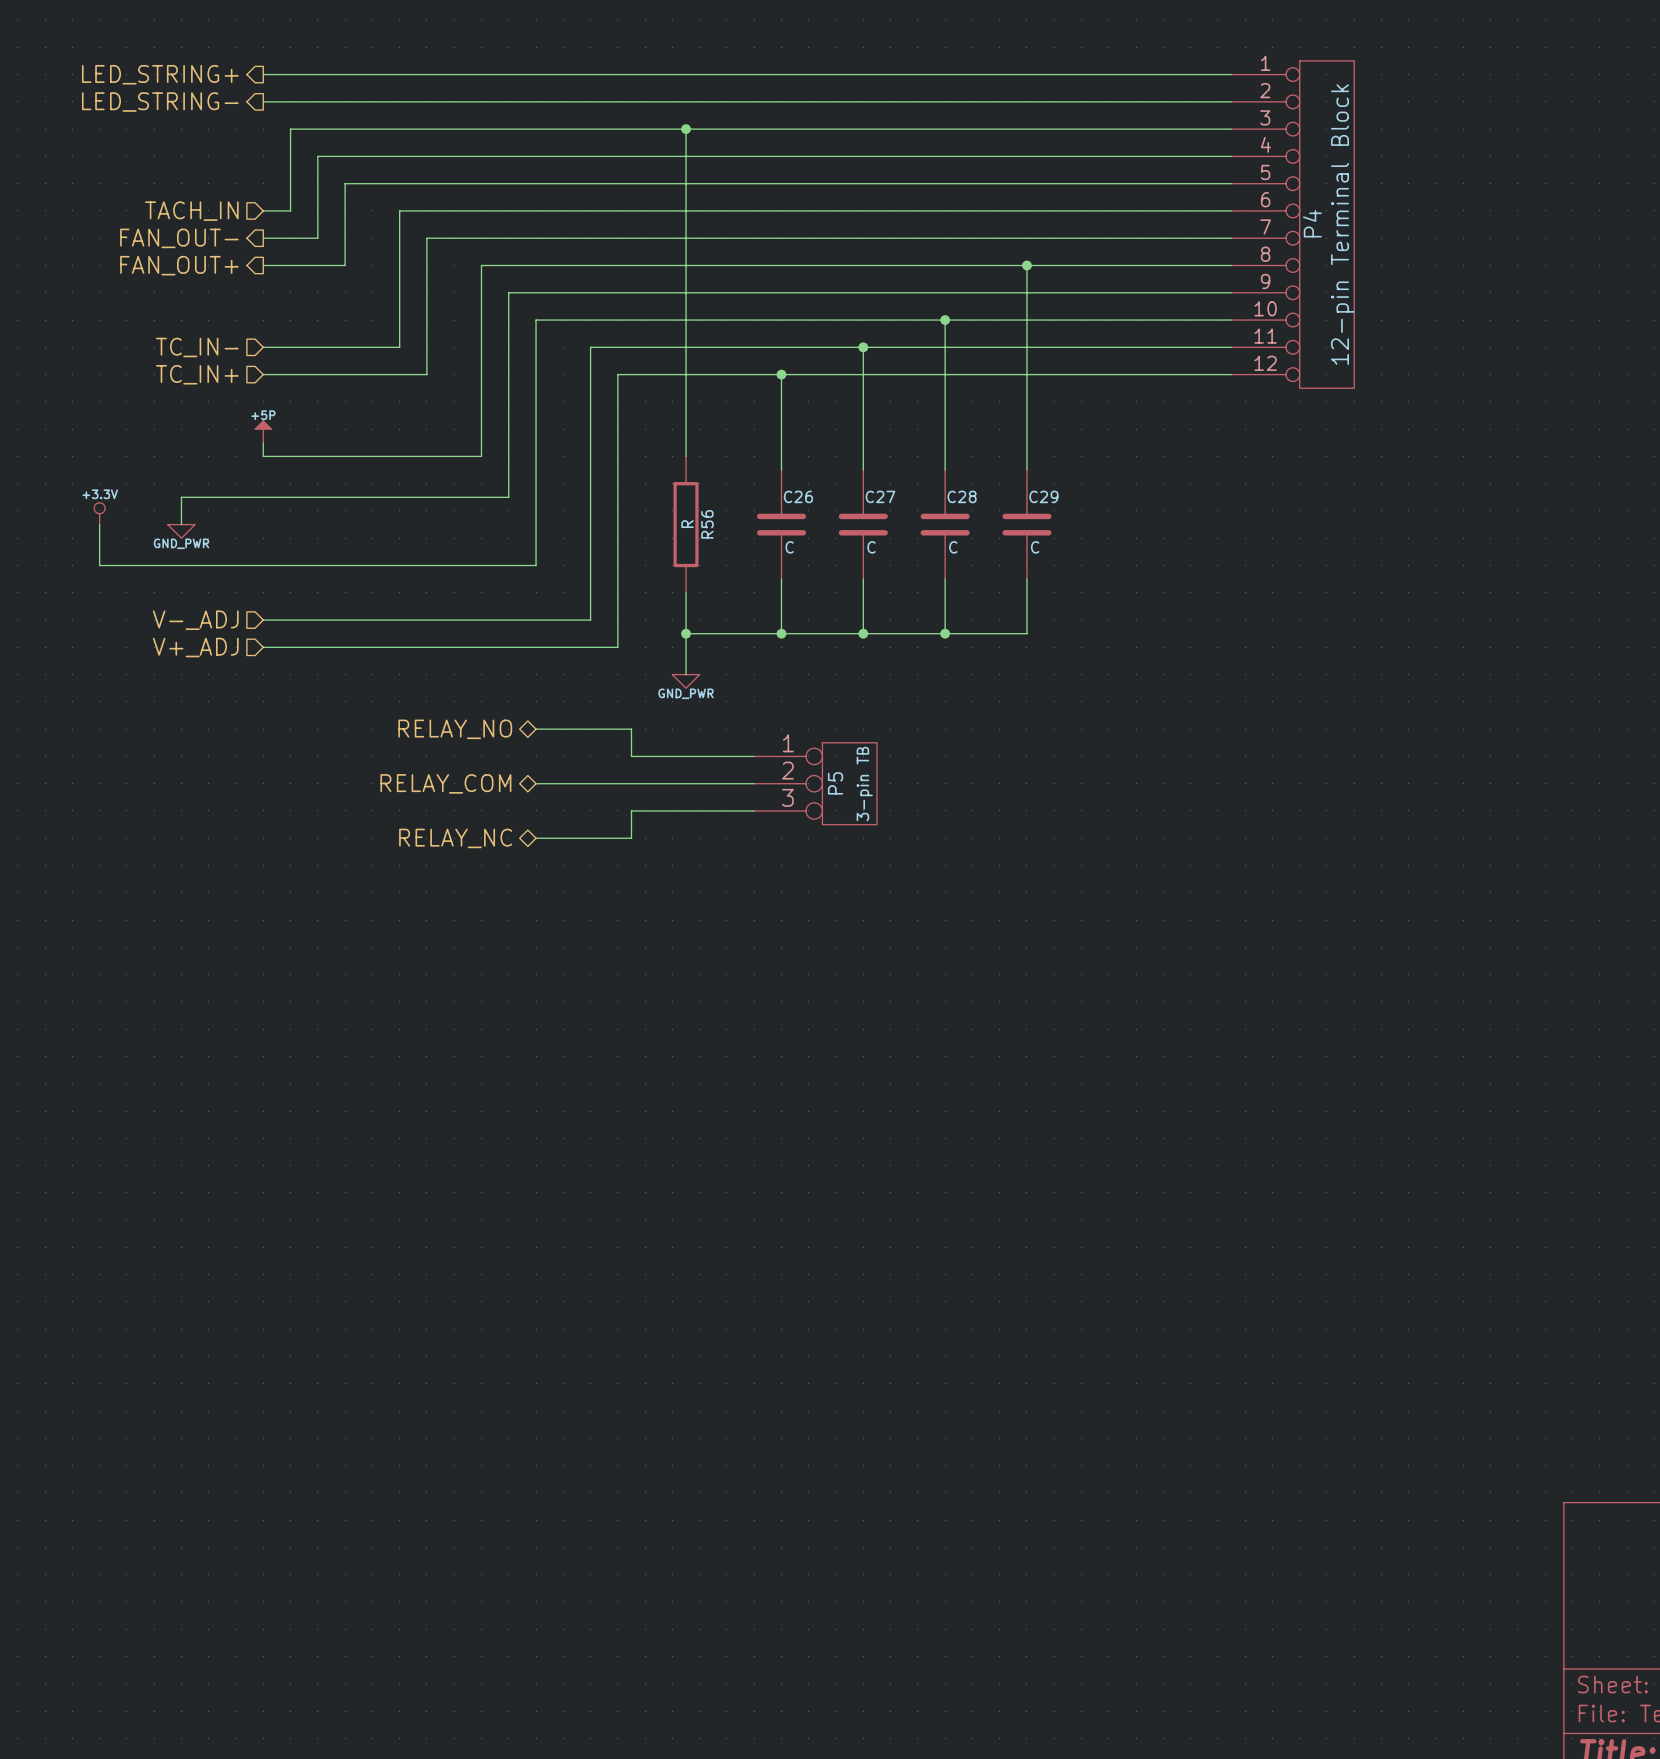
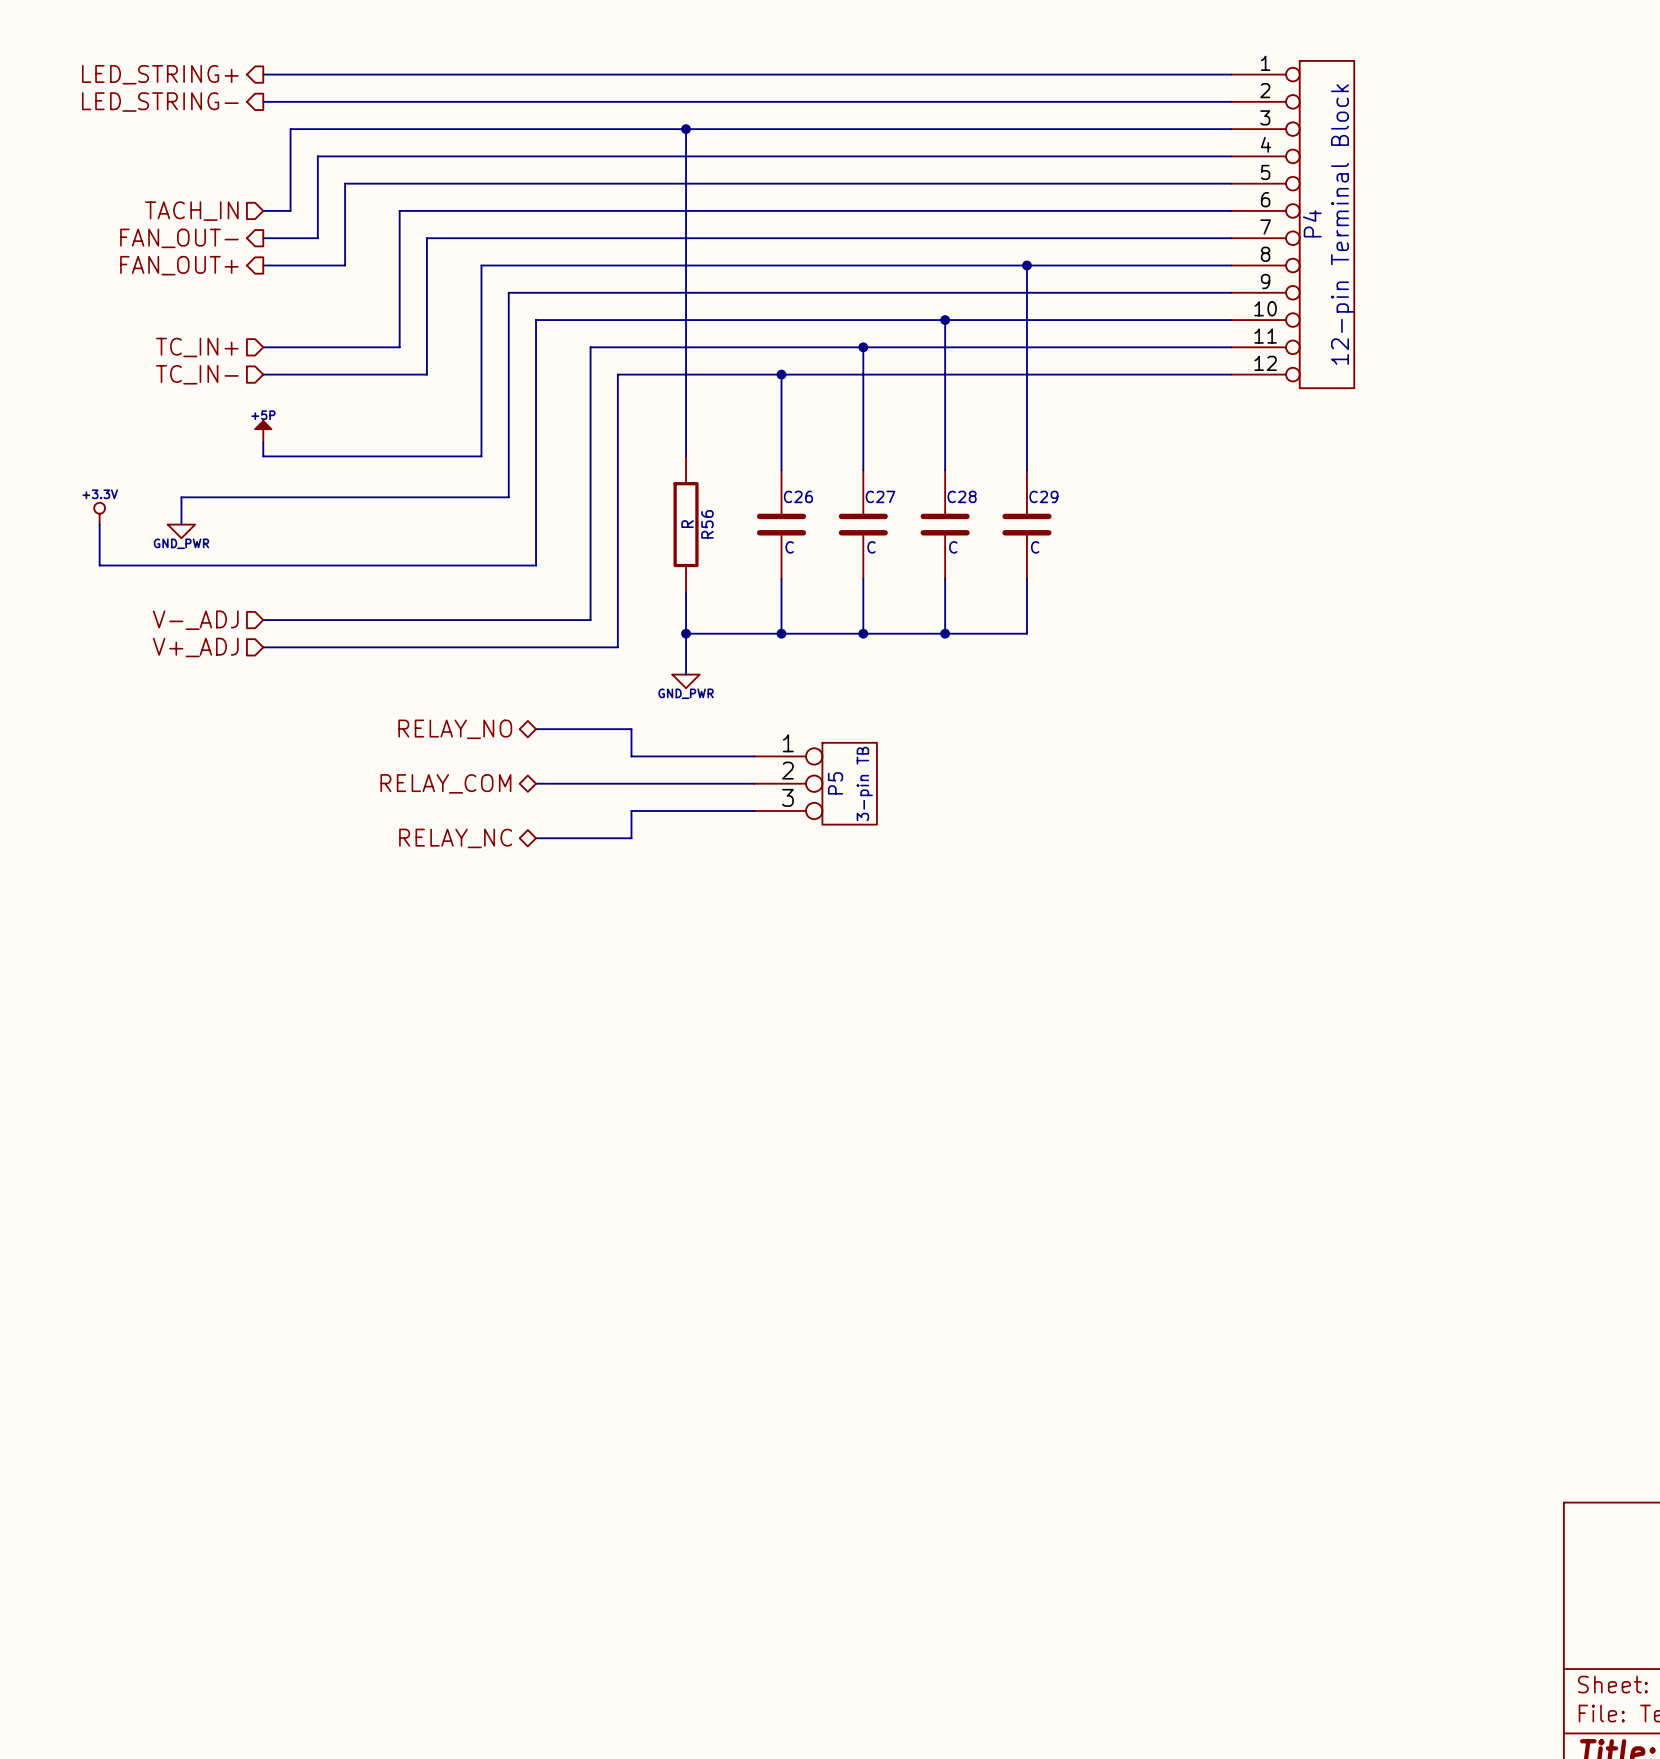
hierarchical label: TC_IN- (197, 347) -> TC_IN+ (197, 347)
hierarchical label: TC_IN+ (197, 374) -> TC_IN- (197, 374)

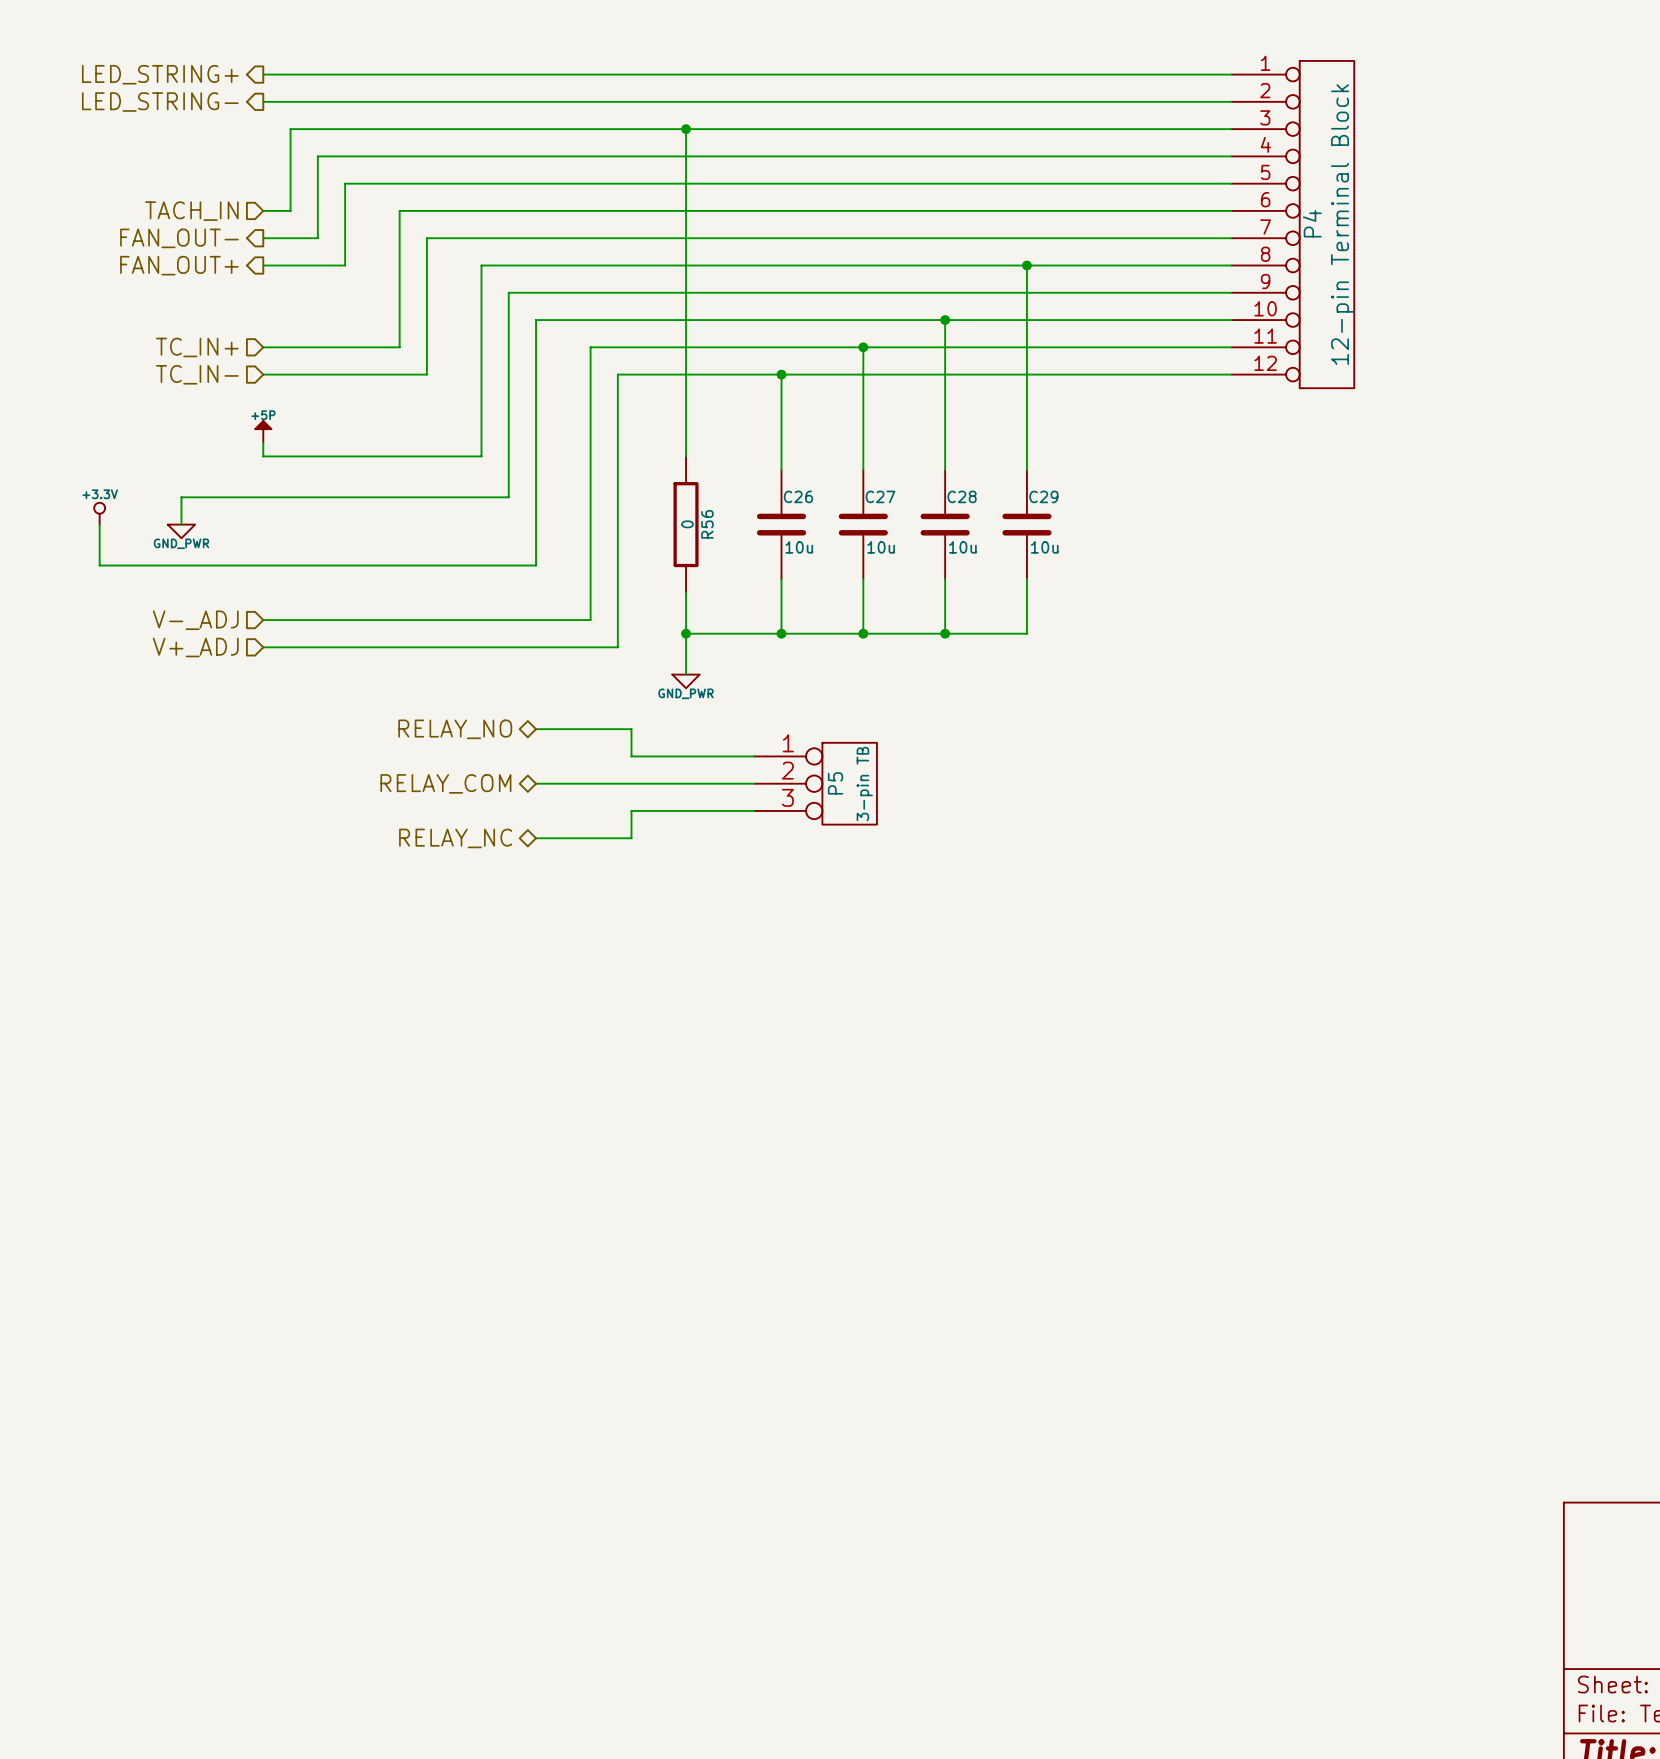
R56 value: R (687, 524) -> 0 (687, 524)
C26 value: C (789, 547) -> 10u (799, 547)
C27 value: C (871, 547) -> 10u (881, 547)
C28 value: C (953, 547) -> 10u (962, 547)
C29 value: C (1035, 547) -> 10u (1044, 547)

